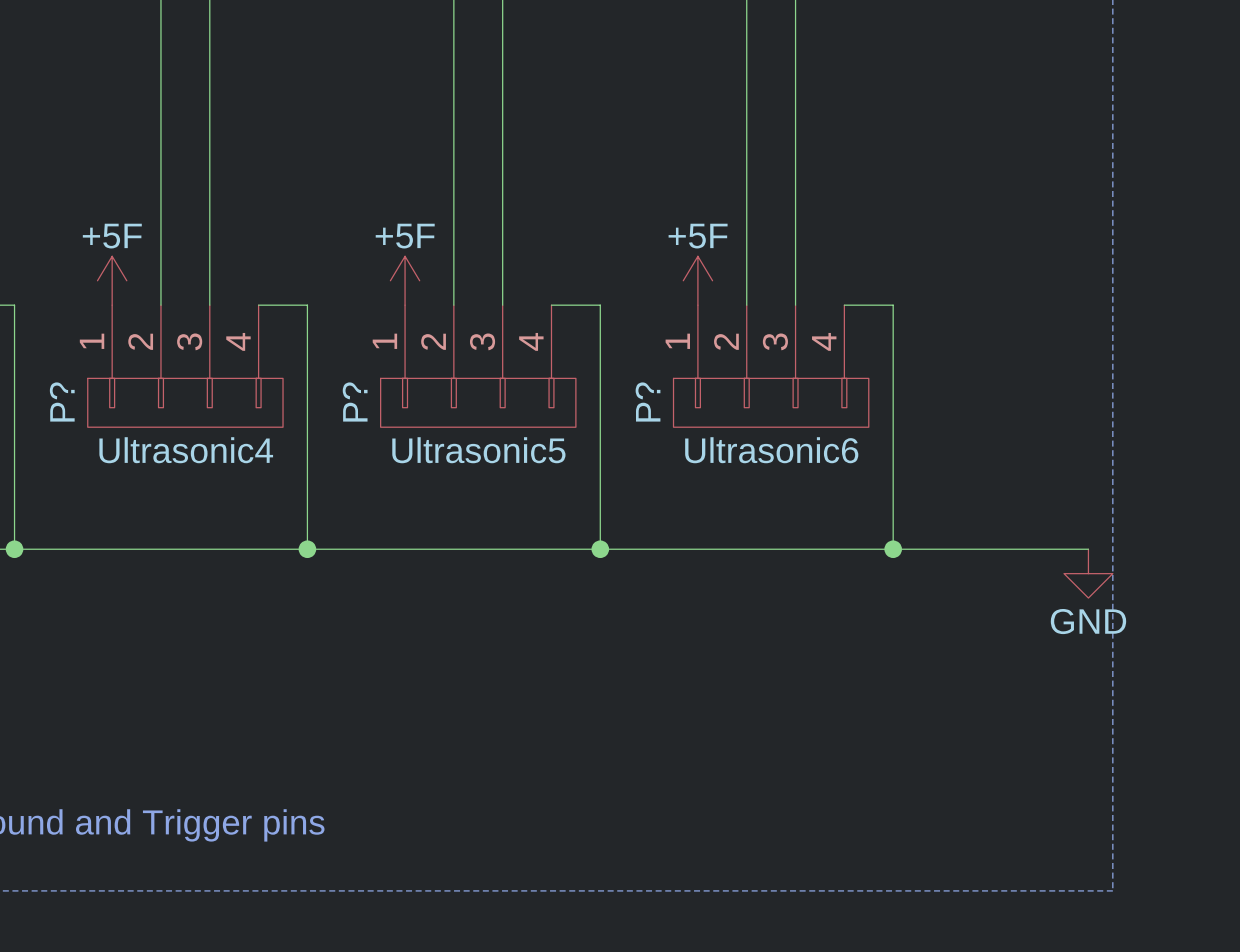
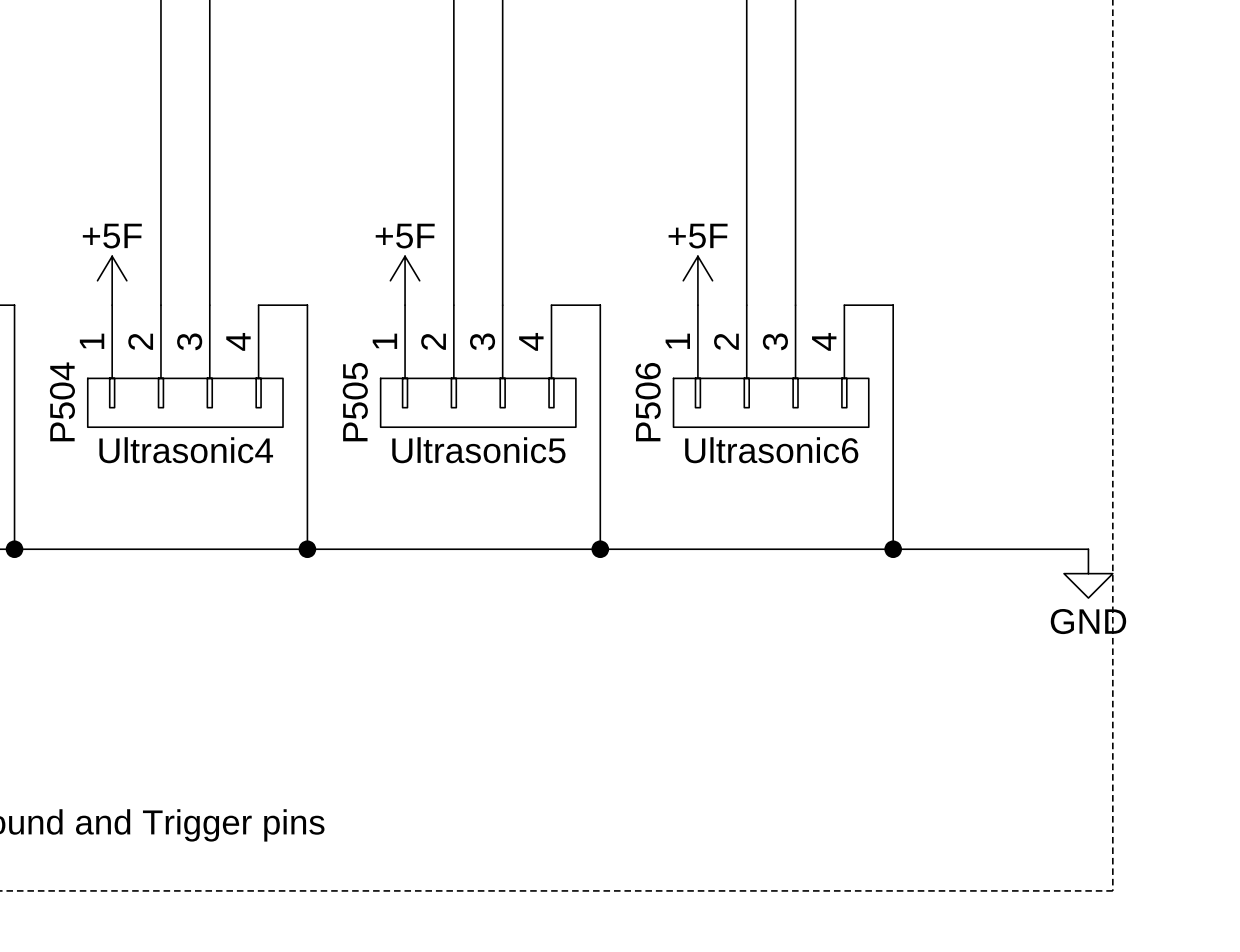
P? name: P? (62, 402) -> P504 (62, 401)
P? name: P? (355, 402) -> P505 (355, 402)
P? name: P? (648, 402) -> P506 (648, 402)

